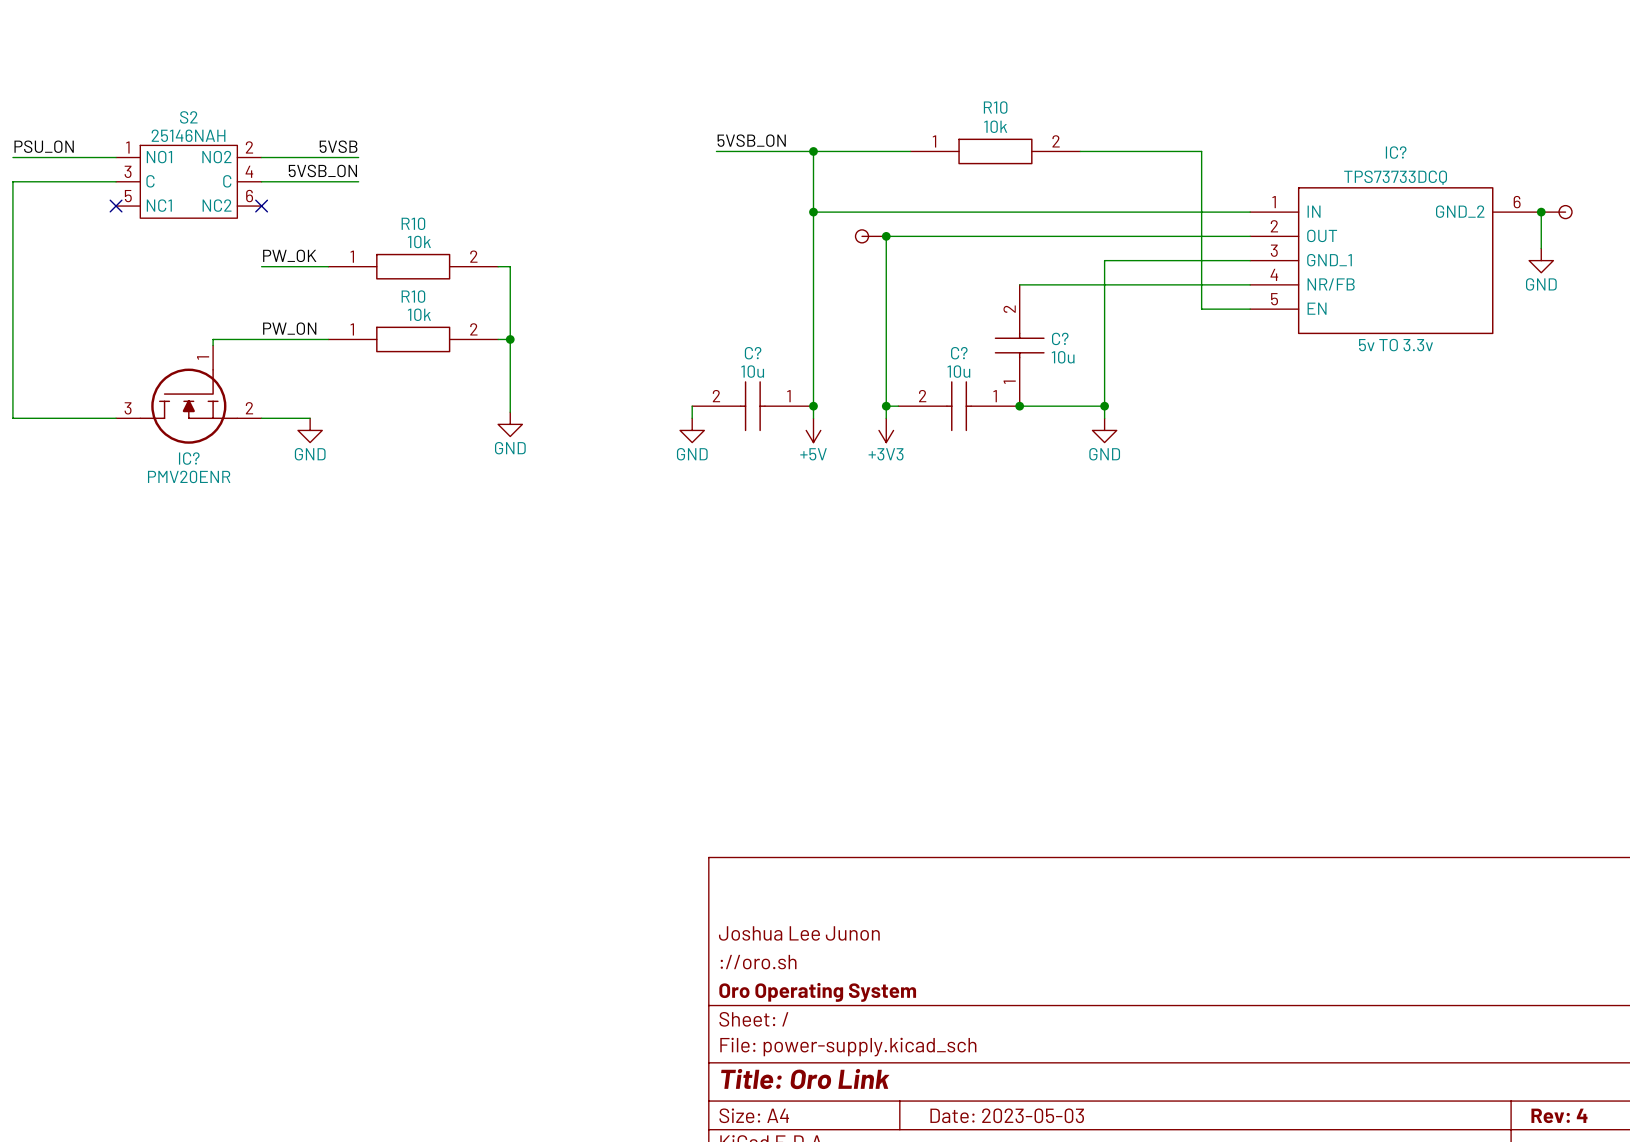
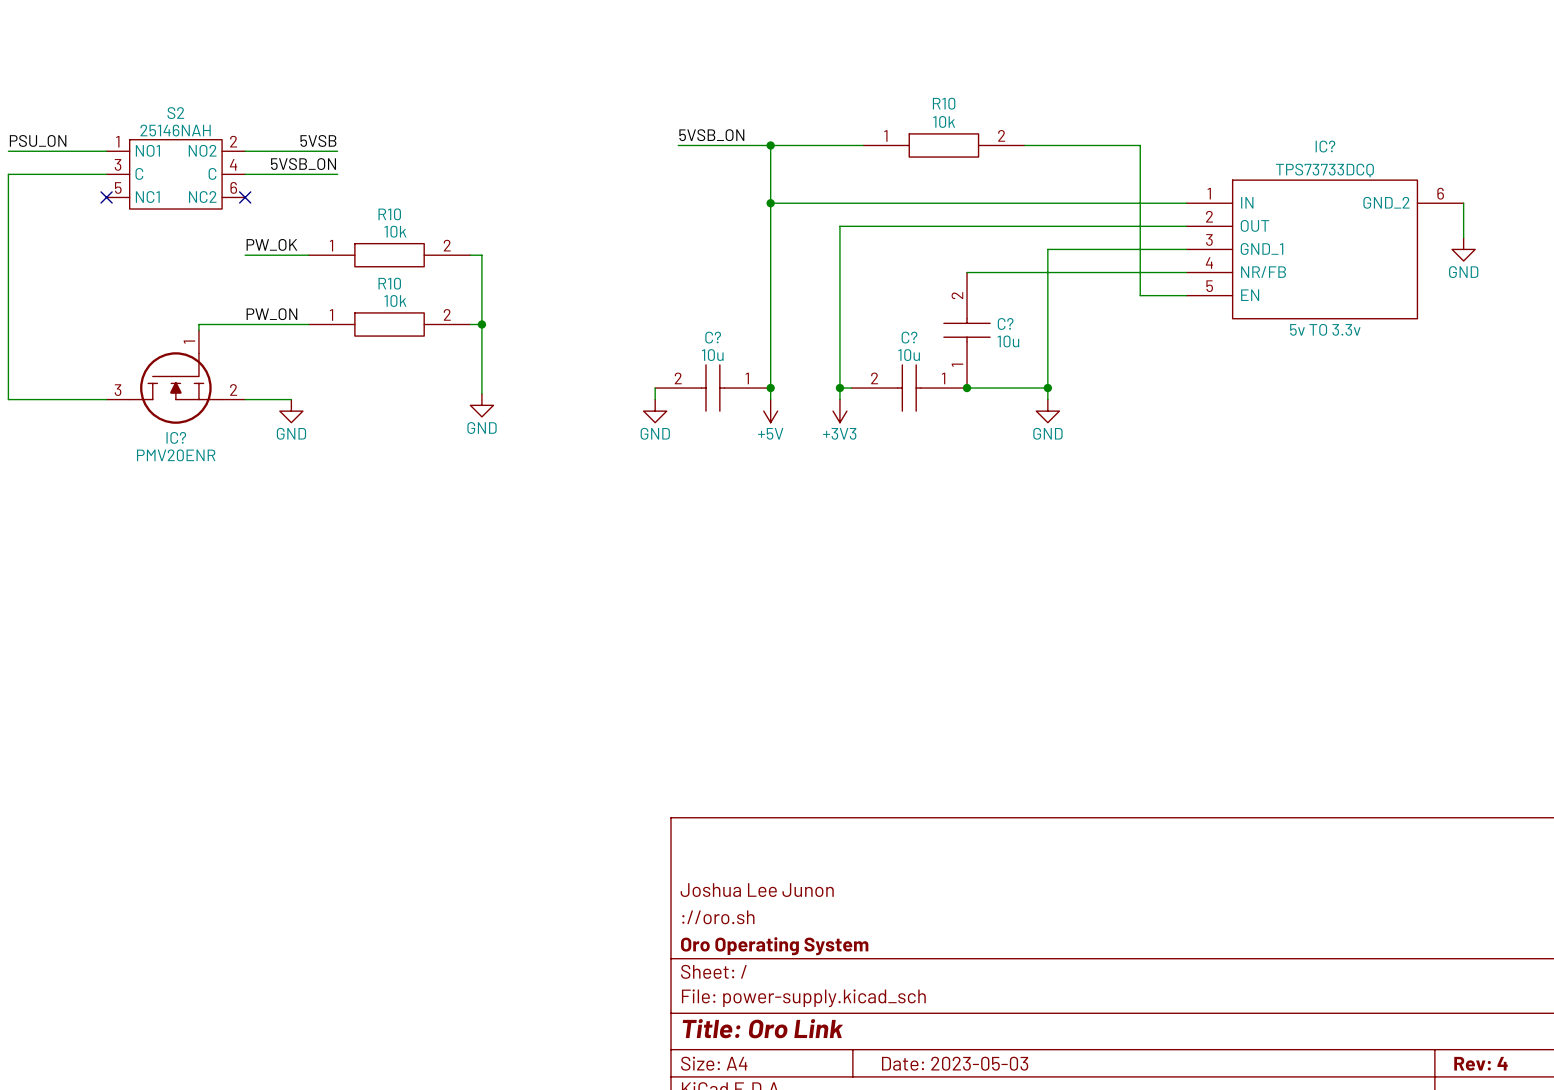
junction: (1541, 212) -> none
part: (1556, 212) -> none
part: (870, 236) -> none
junction: (886, 236) -> none

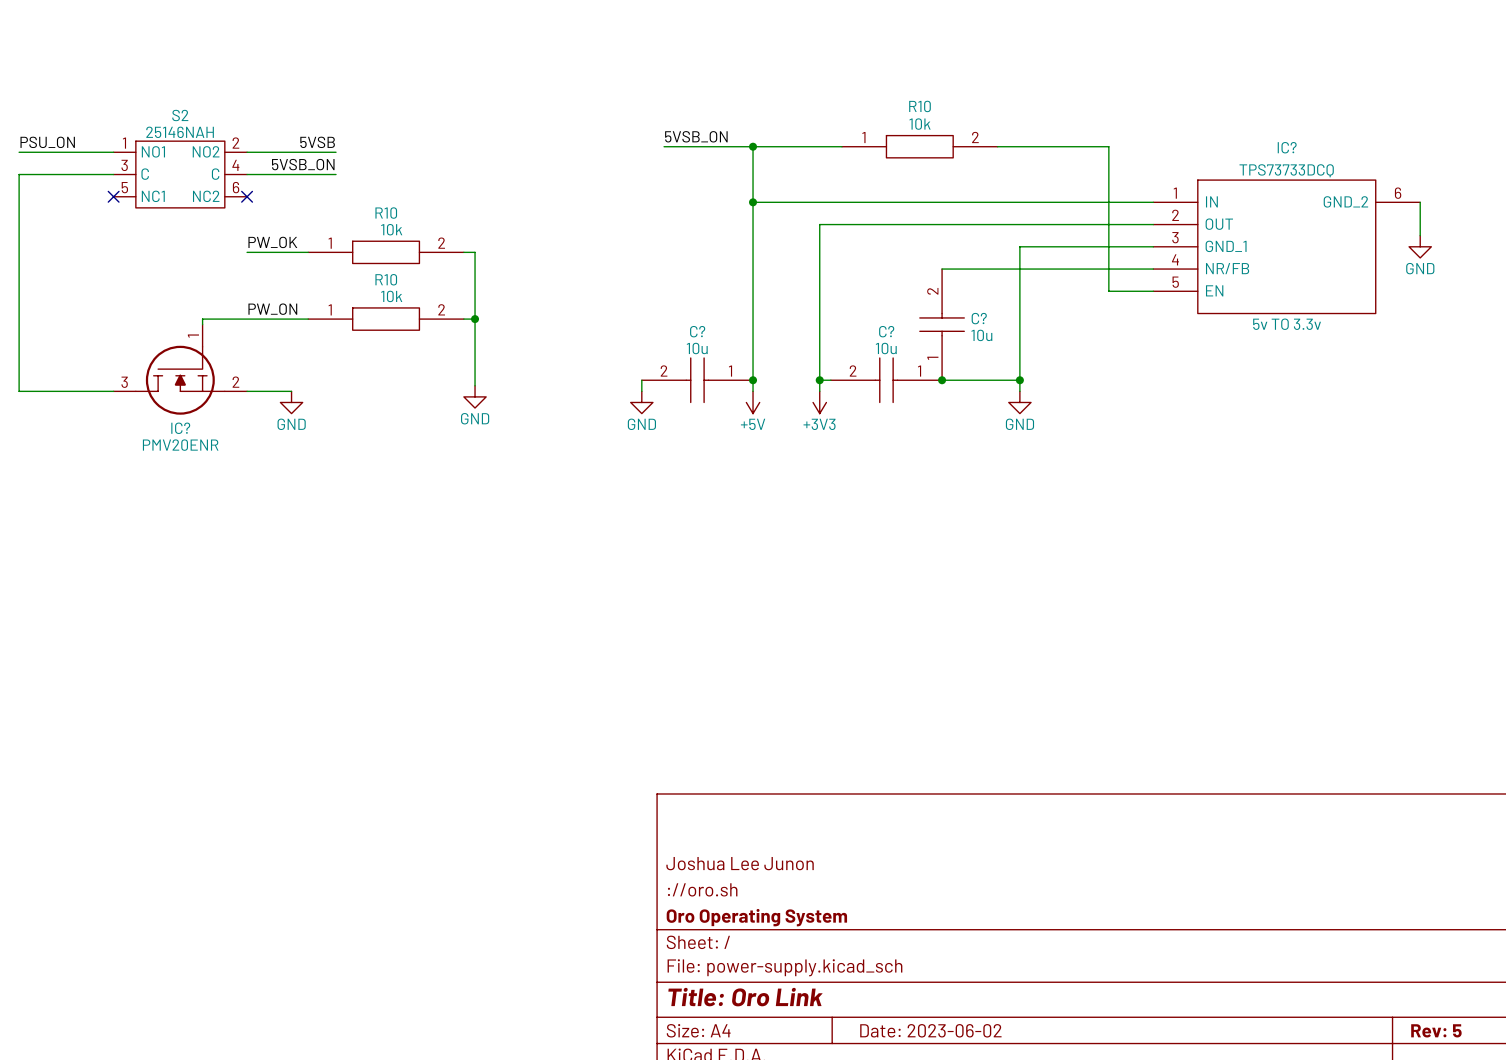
title block: Date: 2023-05-03 (955, 1063) -> Date: 2023-06-02 (930, 1030)
title block: Rev: 4 (1480, 1063) -> Rev: 5 (1436, 1030)

